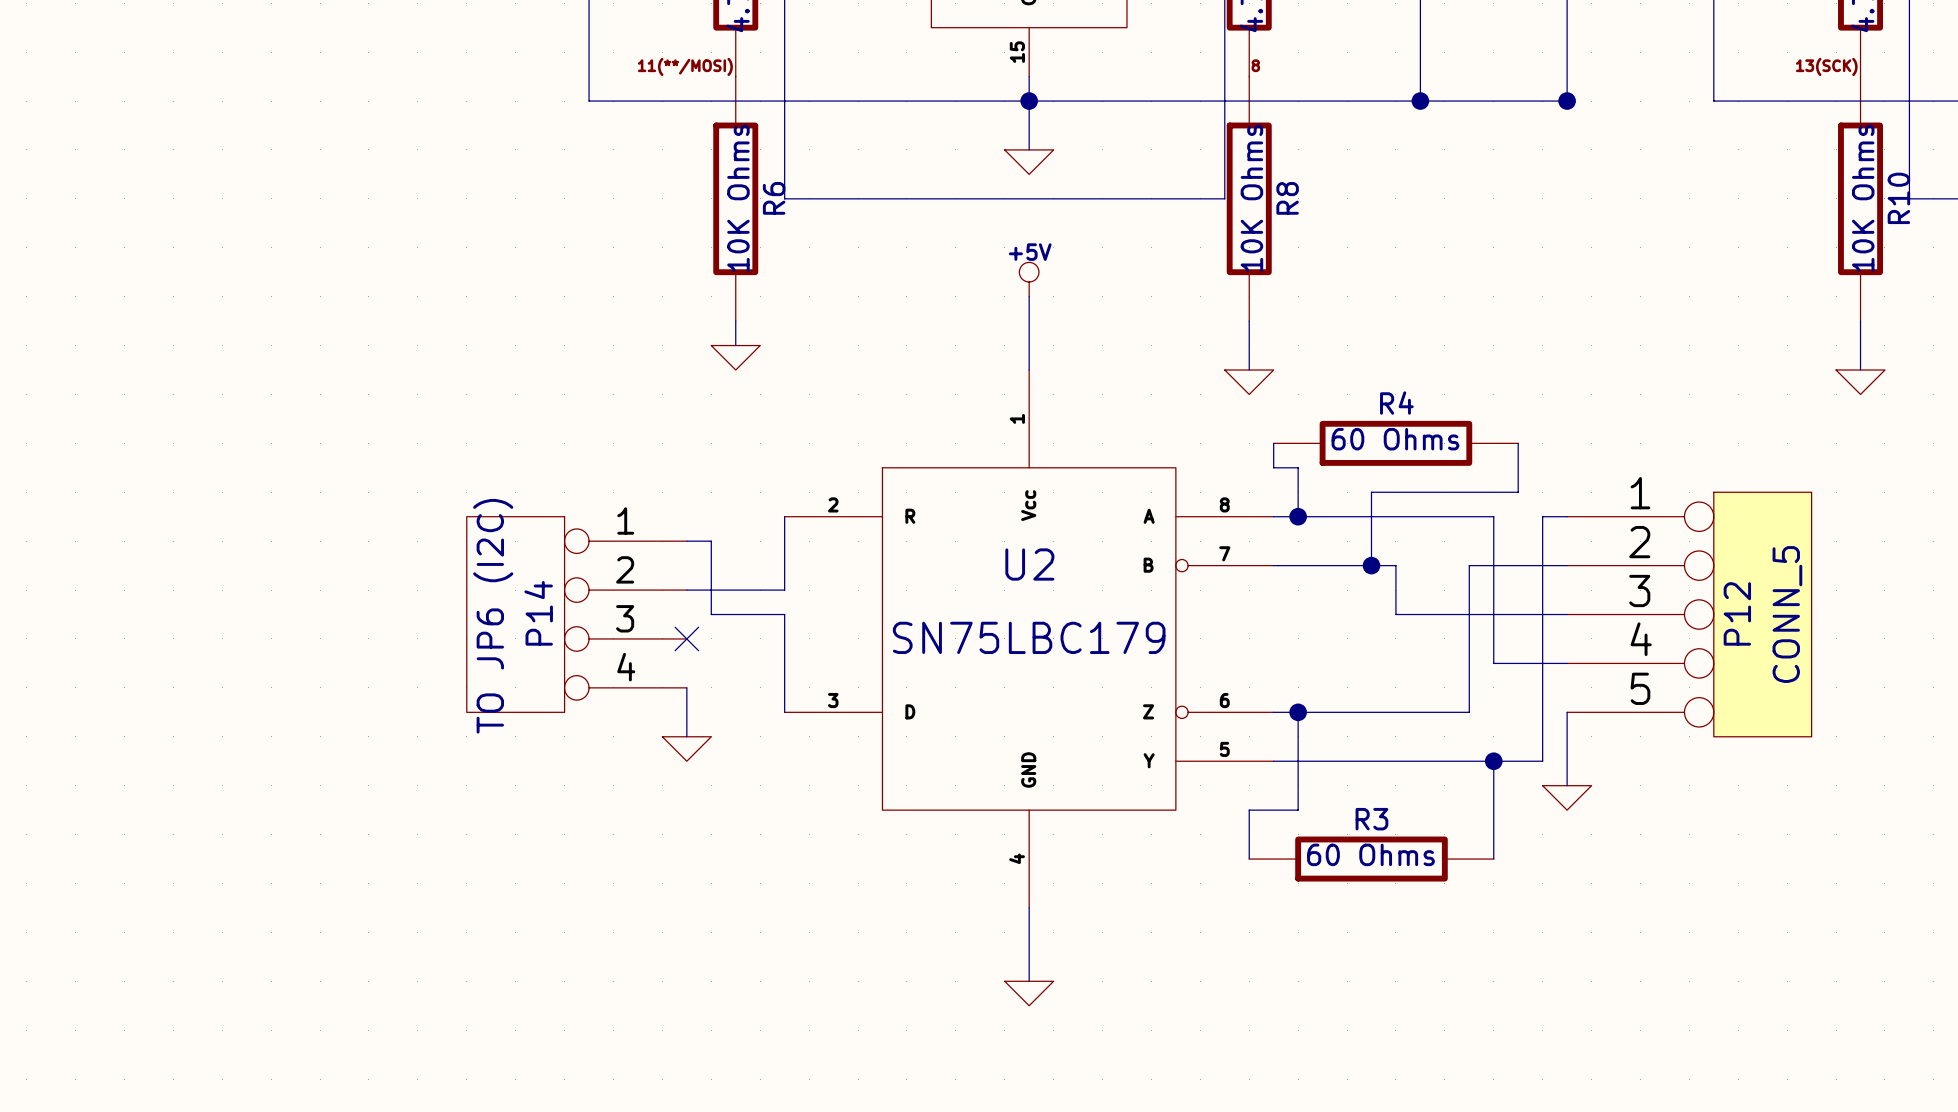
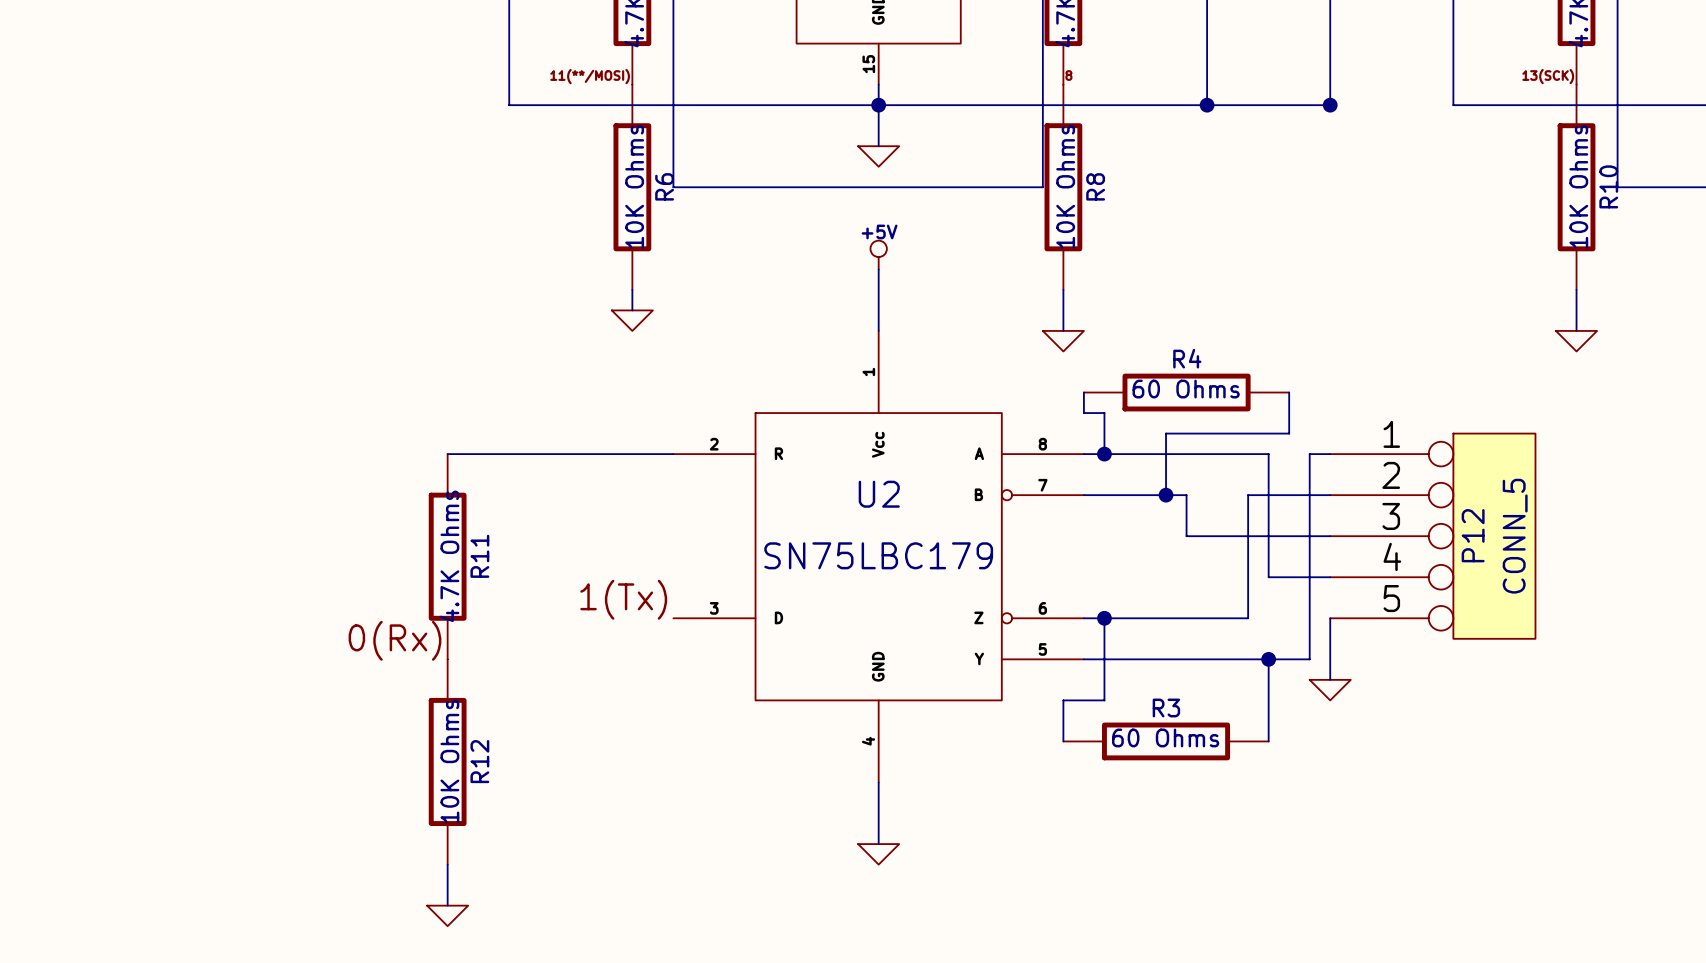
wire: (784, 516) (784, 590) (686, 590) -> (673, 454) (447, 454)
wire: (686, 541) (711, 541) (711, 614) (784, 614) (784, 712) -> none
P14: TO JP6 (I2C) (576, 614) -> none
R11: none -> 4.7K Ohms (447, 556)
no-connect mark: (686, 638) -> none
wire: (686, 687) (686, 736) -> (447, 864) (447, 905)
label: none -> 1(Tx) (623, 599)
label: none -> 0(Rx) (395, 640)
power symbol position: (686, 749) -> (447, 915)
R12: none -> 10K Ohms (447, 761)

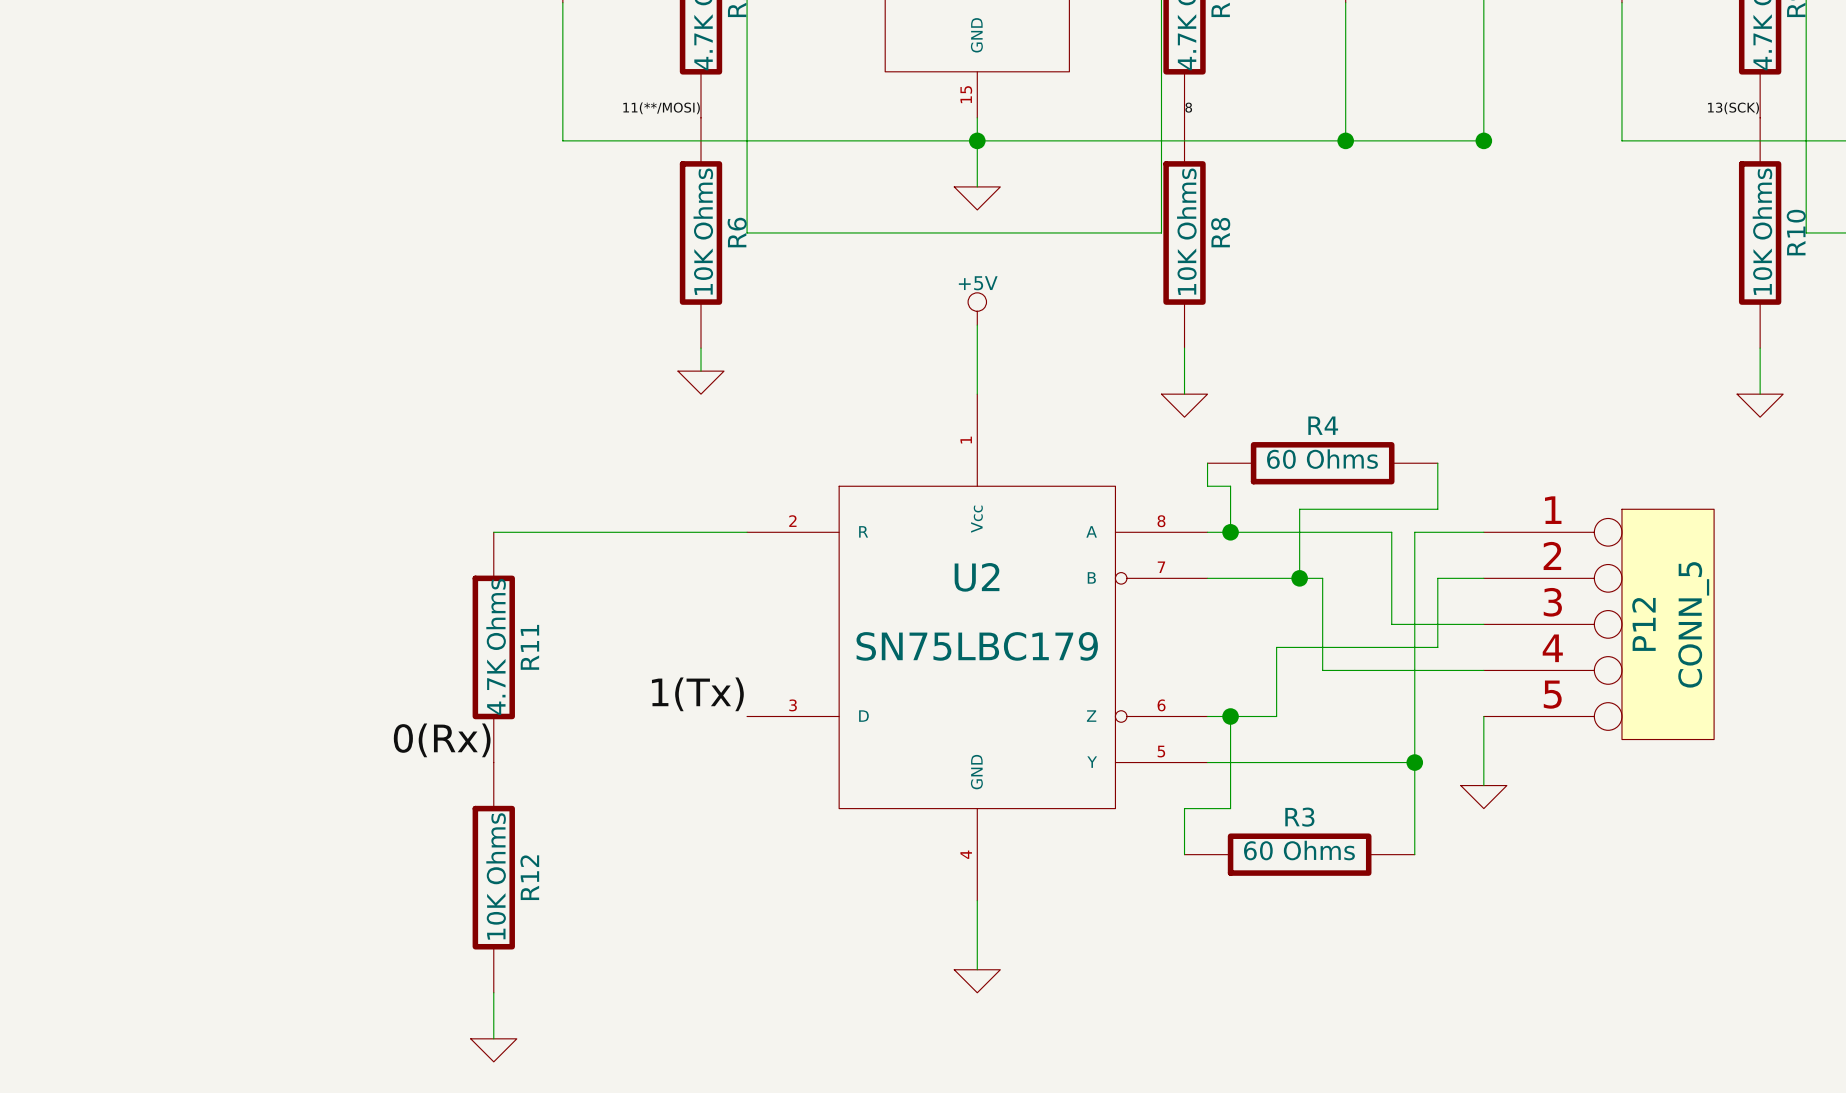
wire: (1248, 454) (1268, 454) -> (1391, 532) (1391, 578)
wire: (1309, 454) (1309, 659) (1268, 659) -> (1322, 624) (1322, 670) (1414, 670) (1414, 762)
wire: (1248, 495) (1289, 495) -> (1414, 532) (1460, 532)
wire: (1186, 536) (1248, 536) (1248, 618) (1145, 618) -> (1437, 578) (1437, 647) (1276, 647) (1276, 716)

